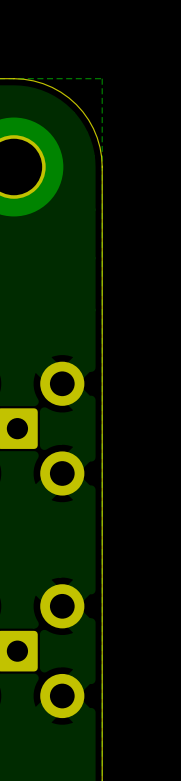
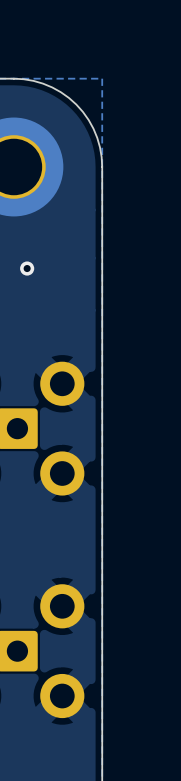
via: none -> (27, 268)

